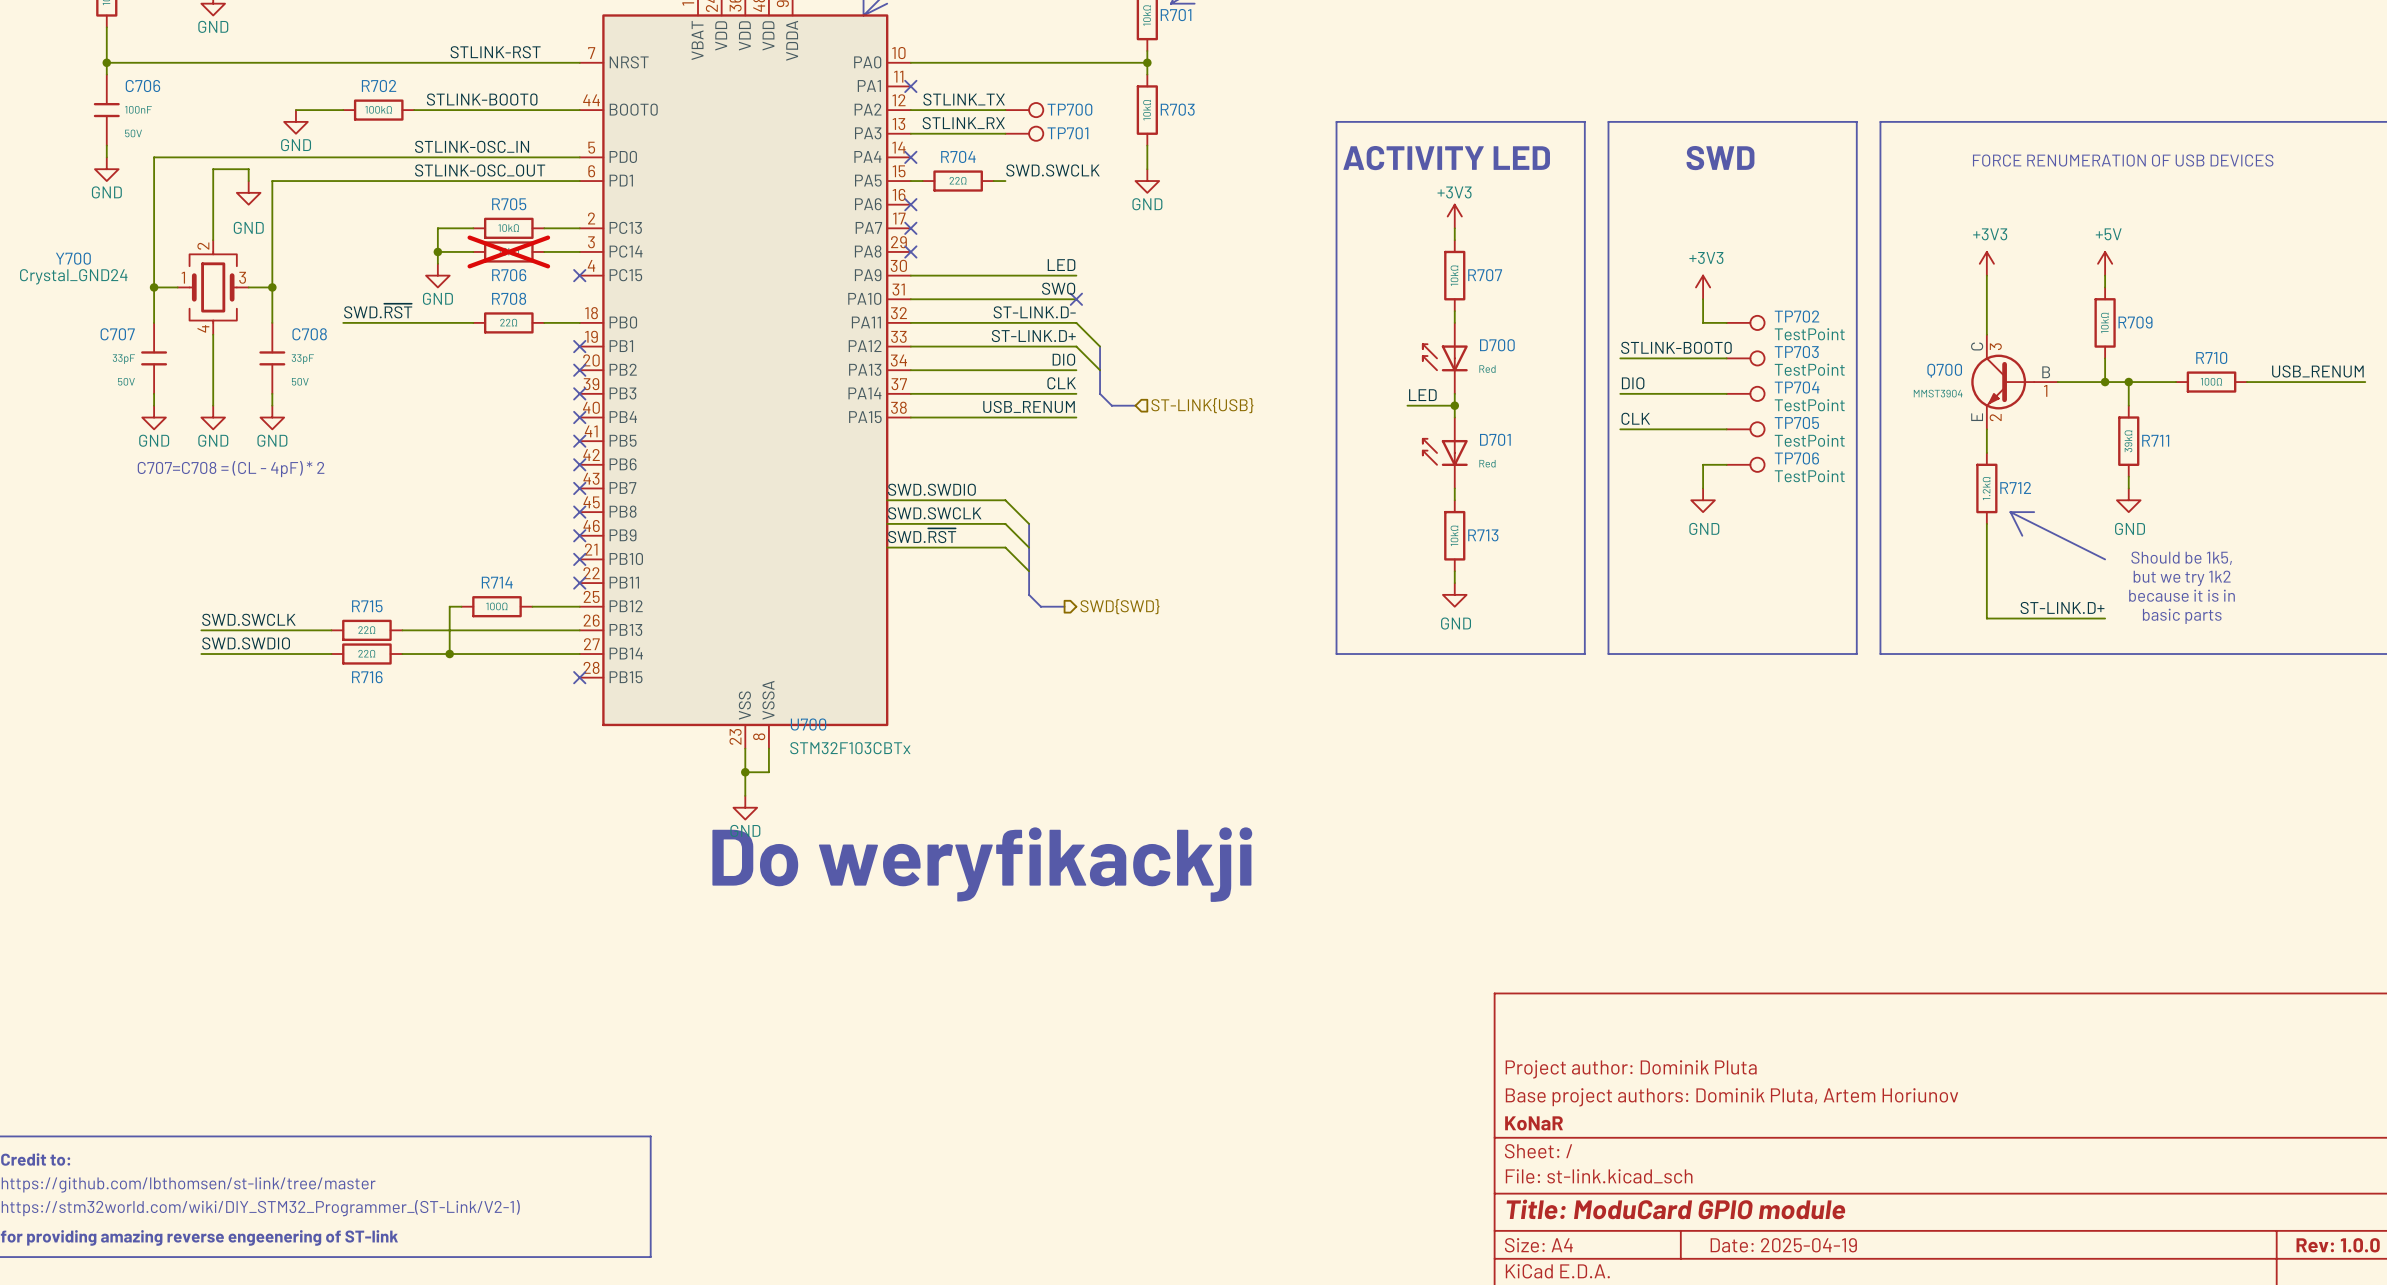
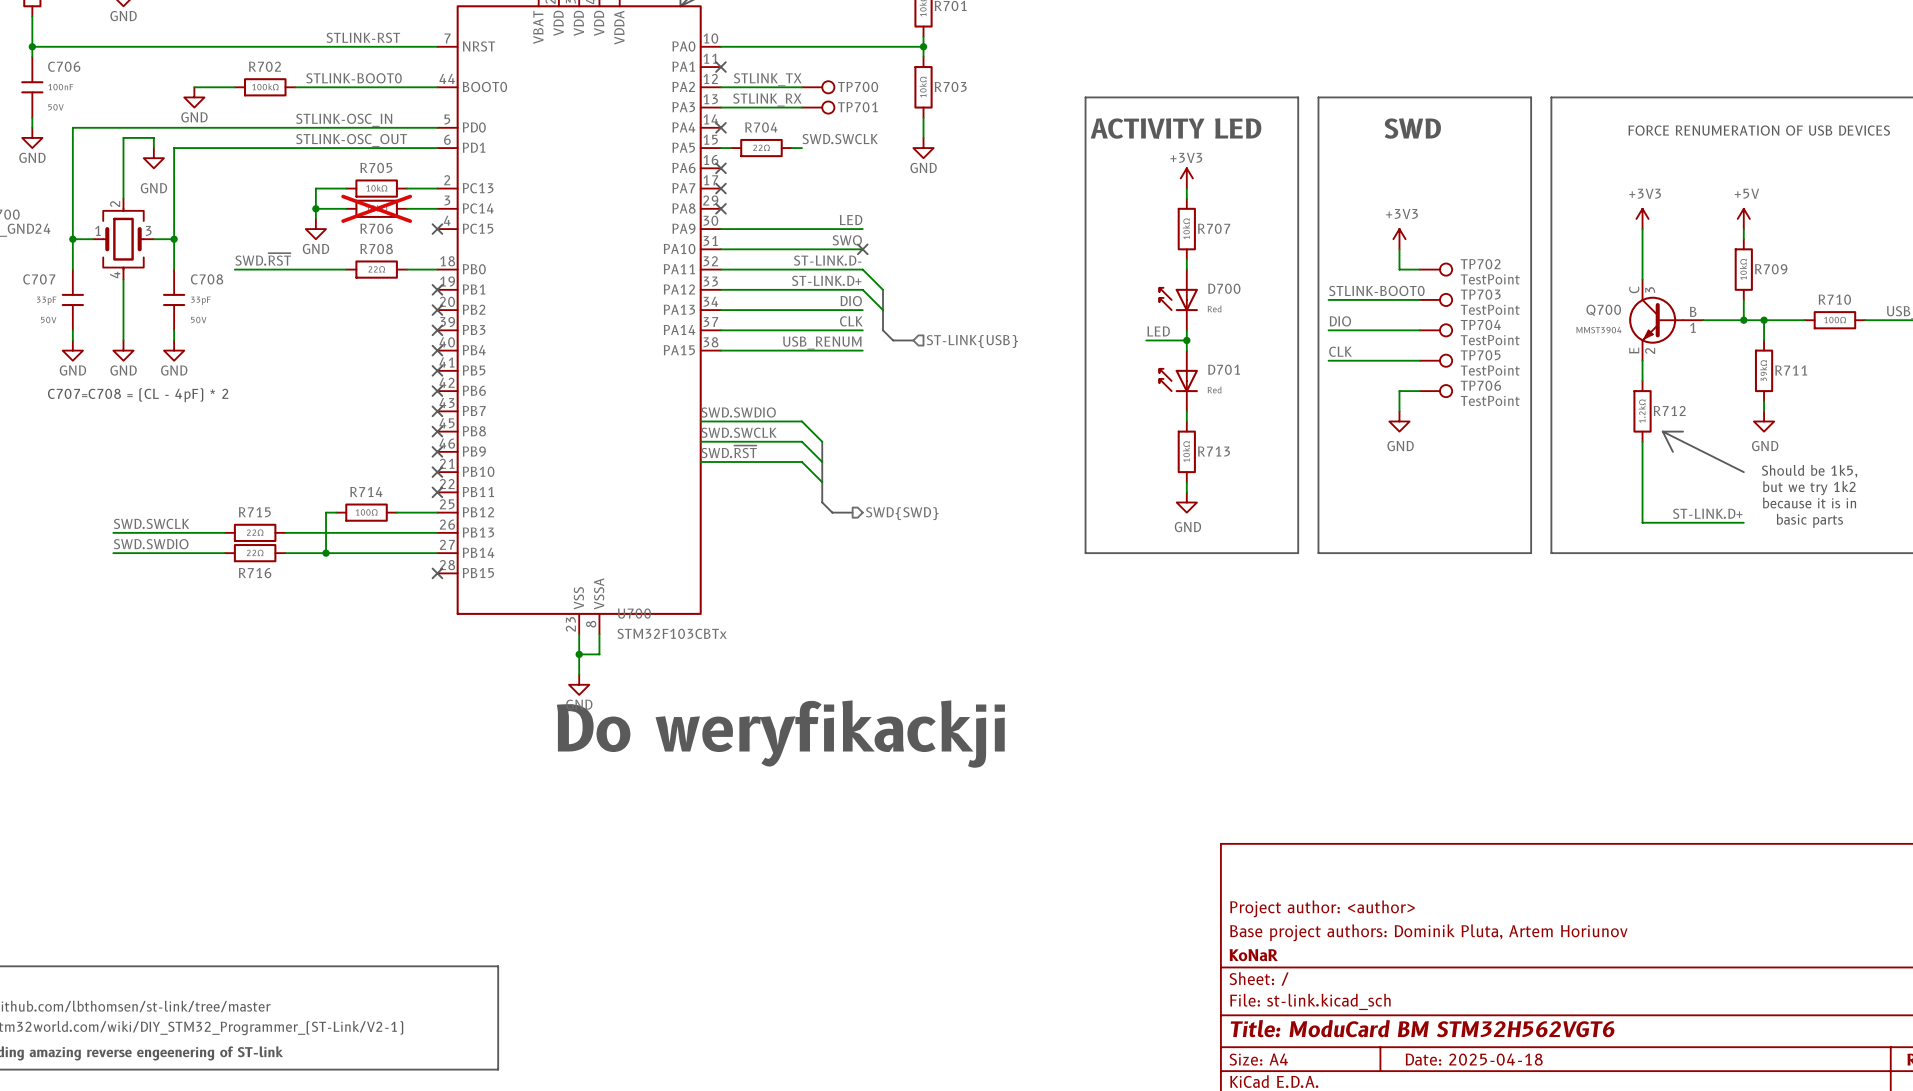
title block: Project author: Dominik Pluta (1631, 1069) -> Project author: <author> (1322, 908)
title block: Title: ModuCard GPIO module (1675, 1209) -> Title: ModuCard BM STM32H562VGT6 (1422, 1028)
title block: Date: 2025-04-19 (1783, 1245) -> Date: 2025-04-18 (1474, 1059)

